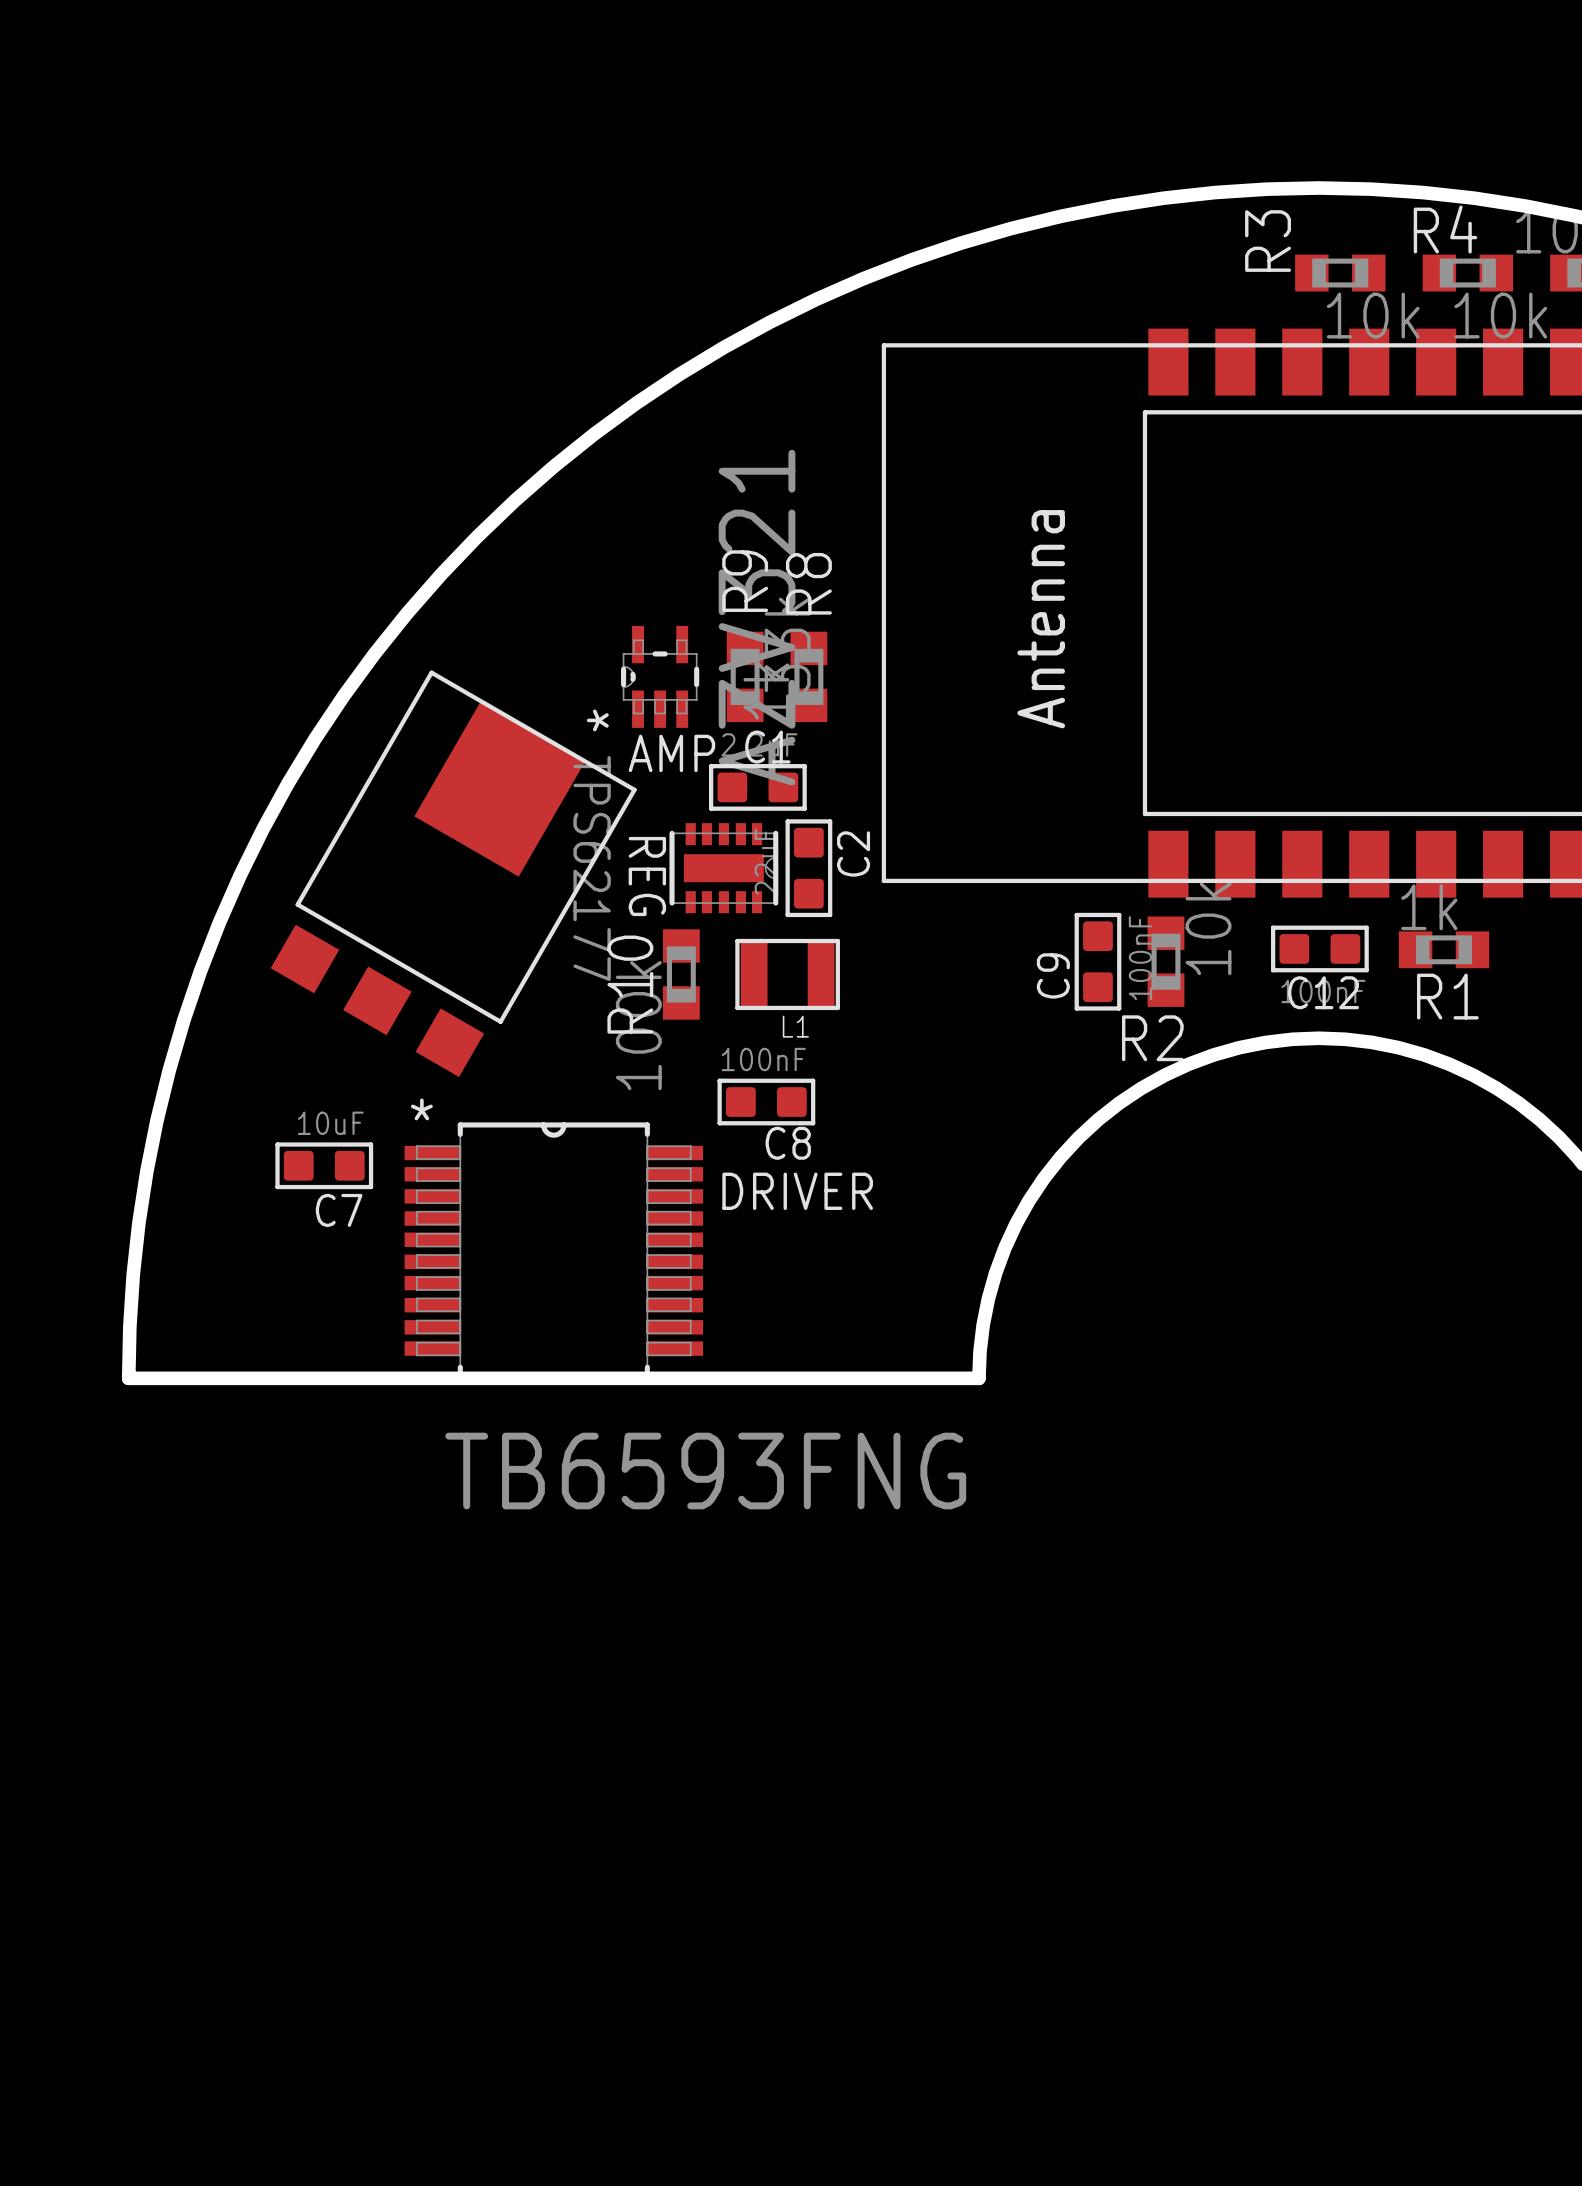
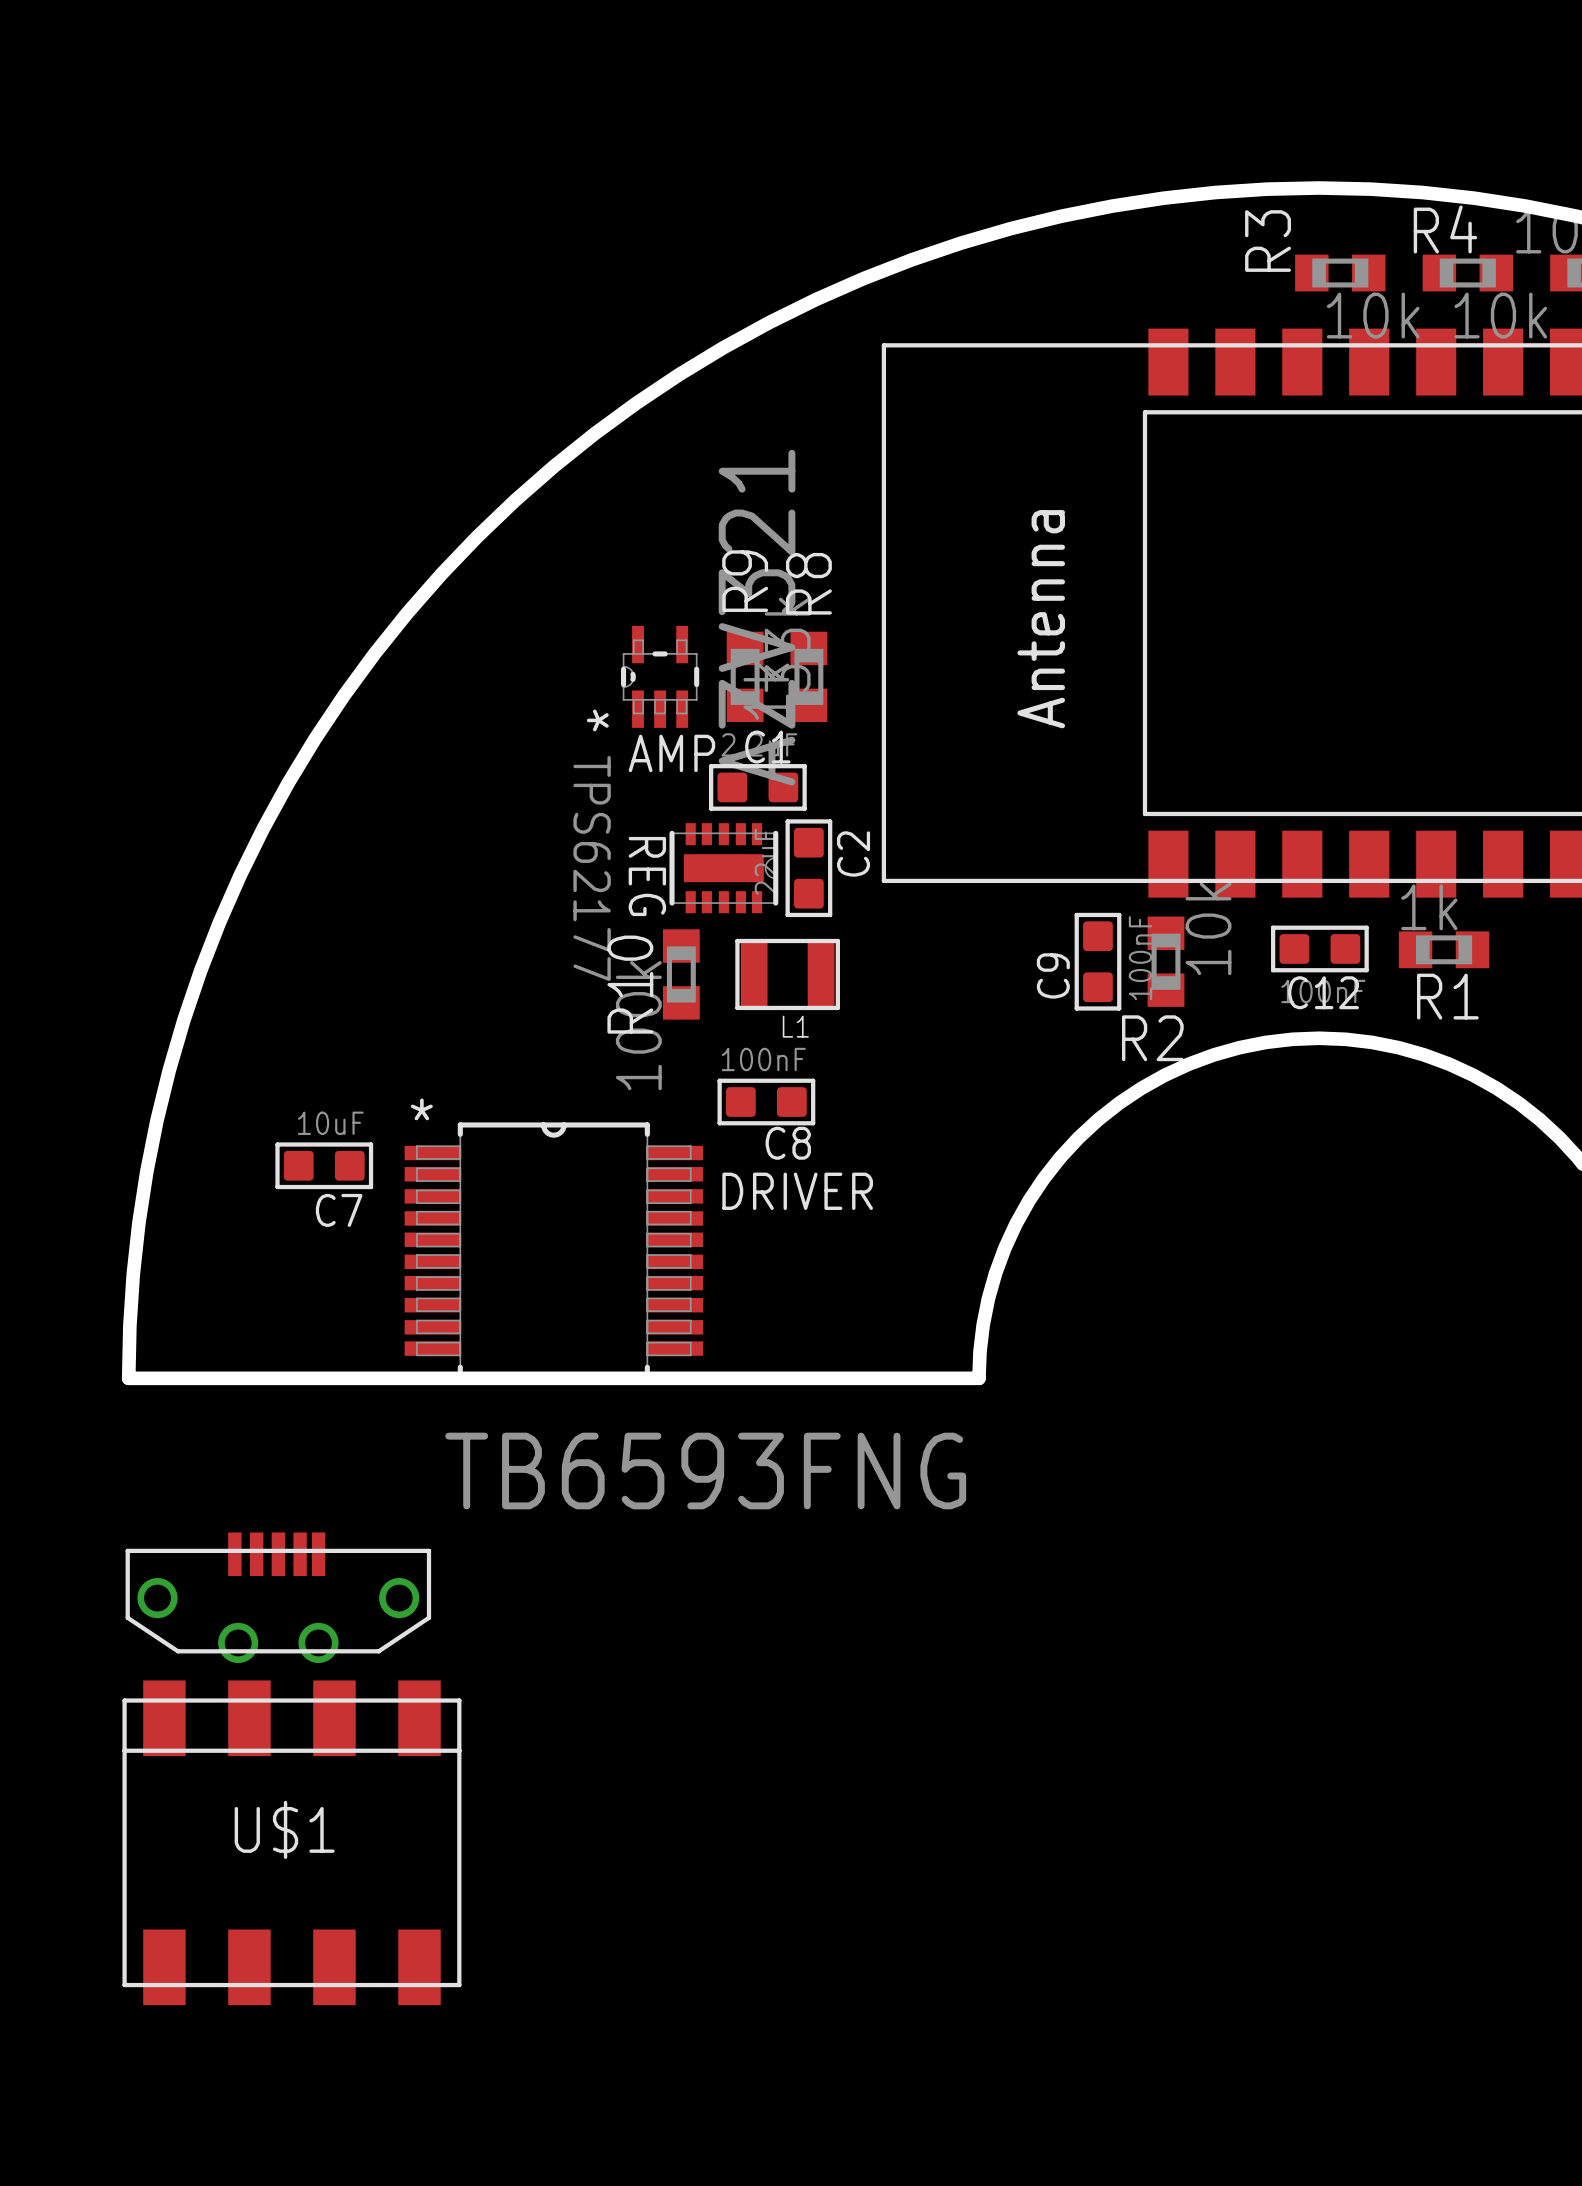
part: (453, 873) -> none
part: none -> (278, 1597)
U$1: none -> (291, 1842)

